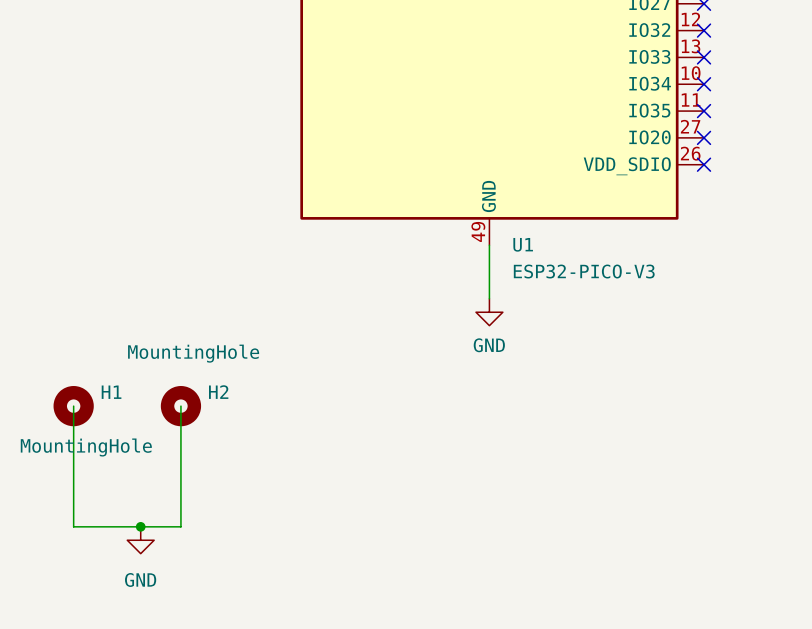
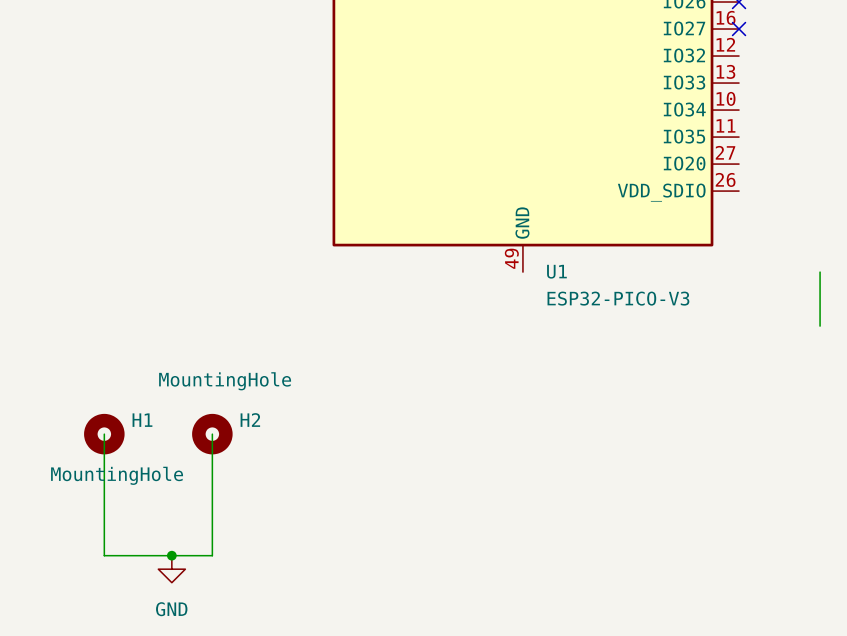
no-connect mark: (704, 30) -> none
no-connect mark: (704, 57) -> none
no-connect mark: (704, 84) -> none
no-connect mark: (704, 111) -> none
no-connect mark: (704, 137) -> none
no-connect mark: (704, 164) -> none
wire: (489, 245) (489, 298) -> none
wire: none -> (820, 272) (820, 326)
power symbol: GND (489, 312) -> none

